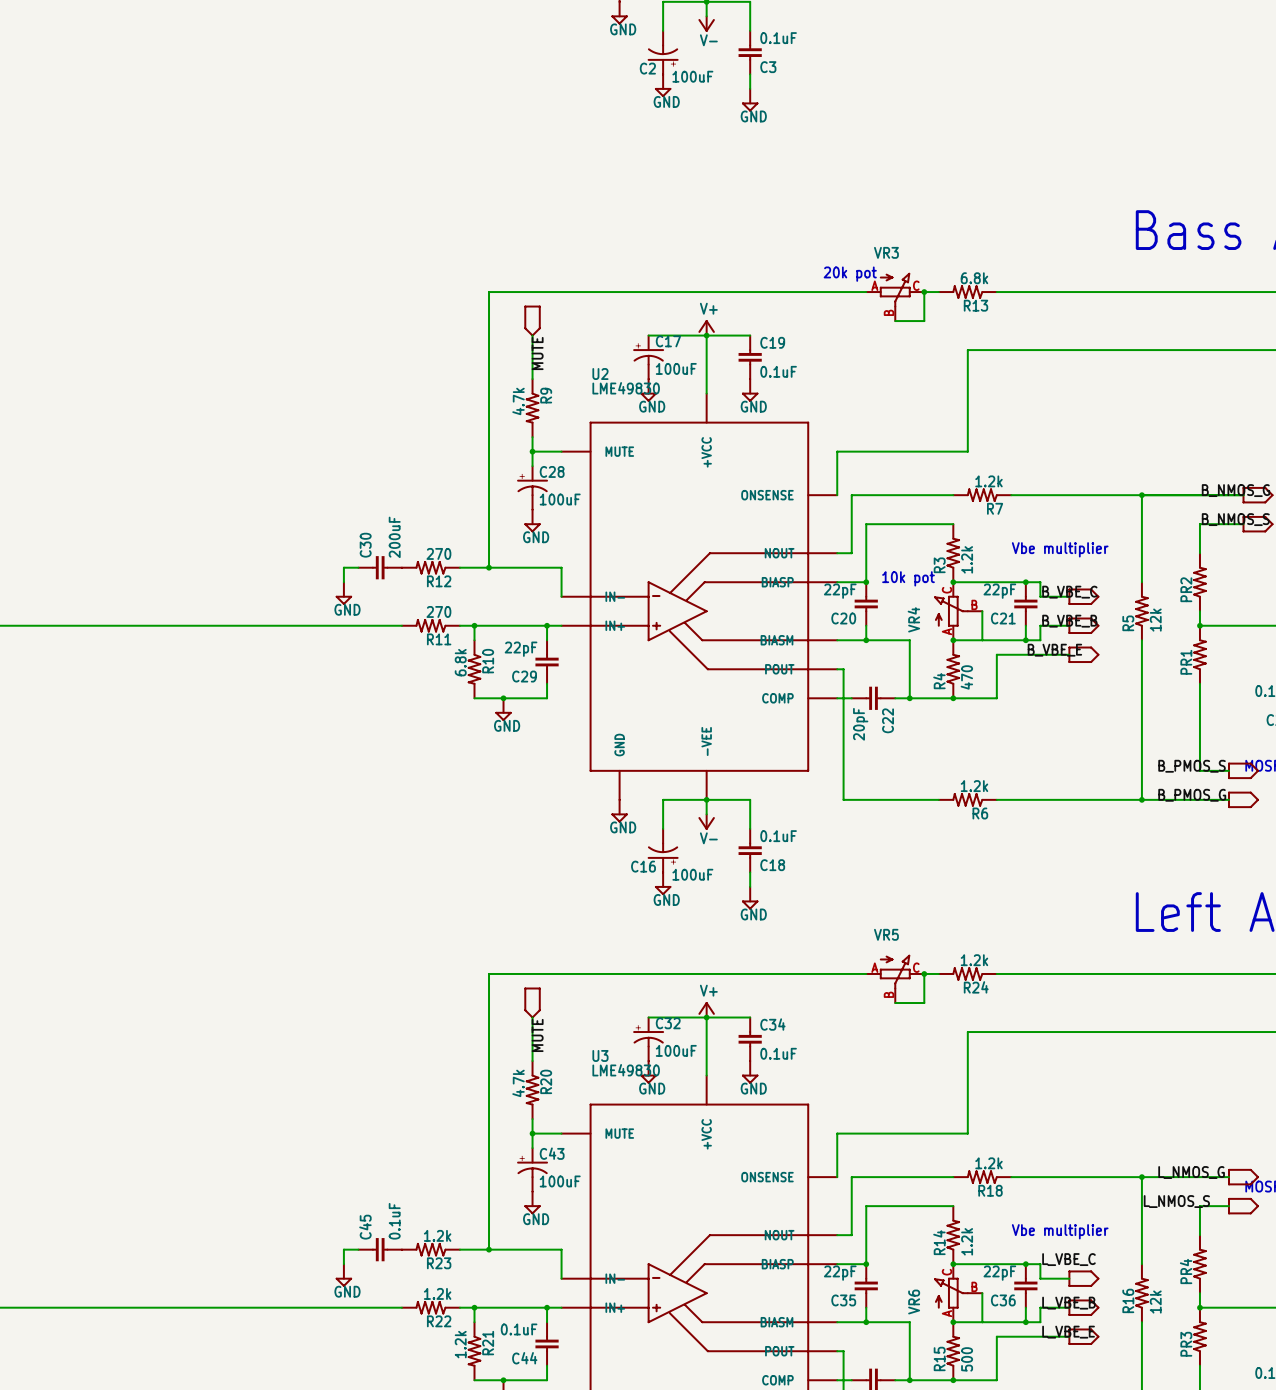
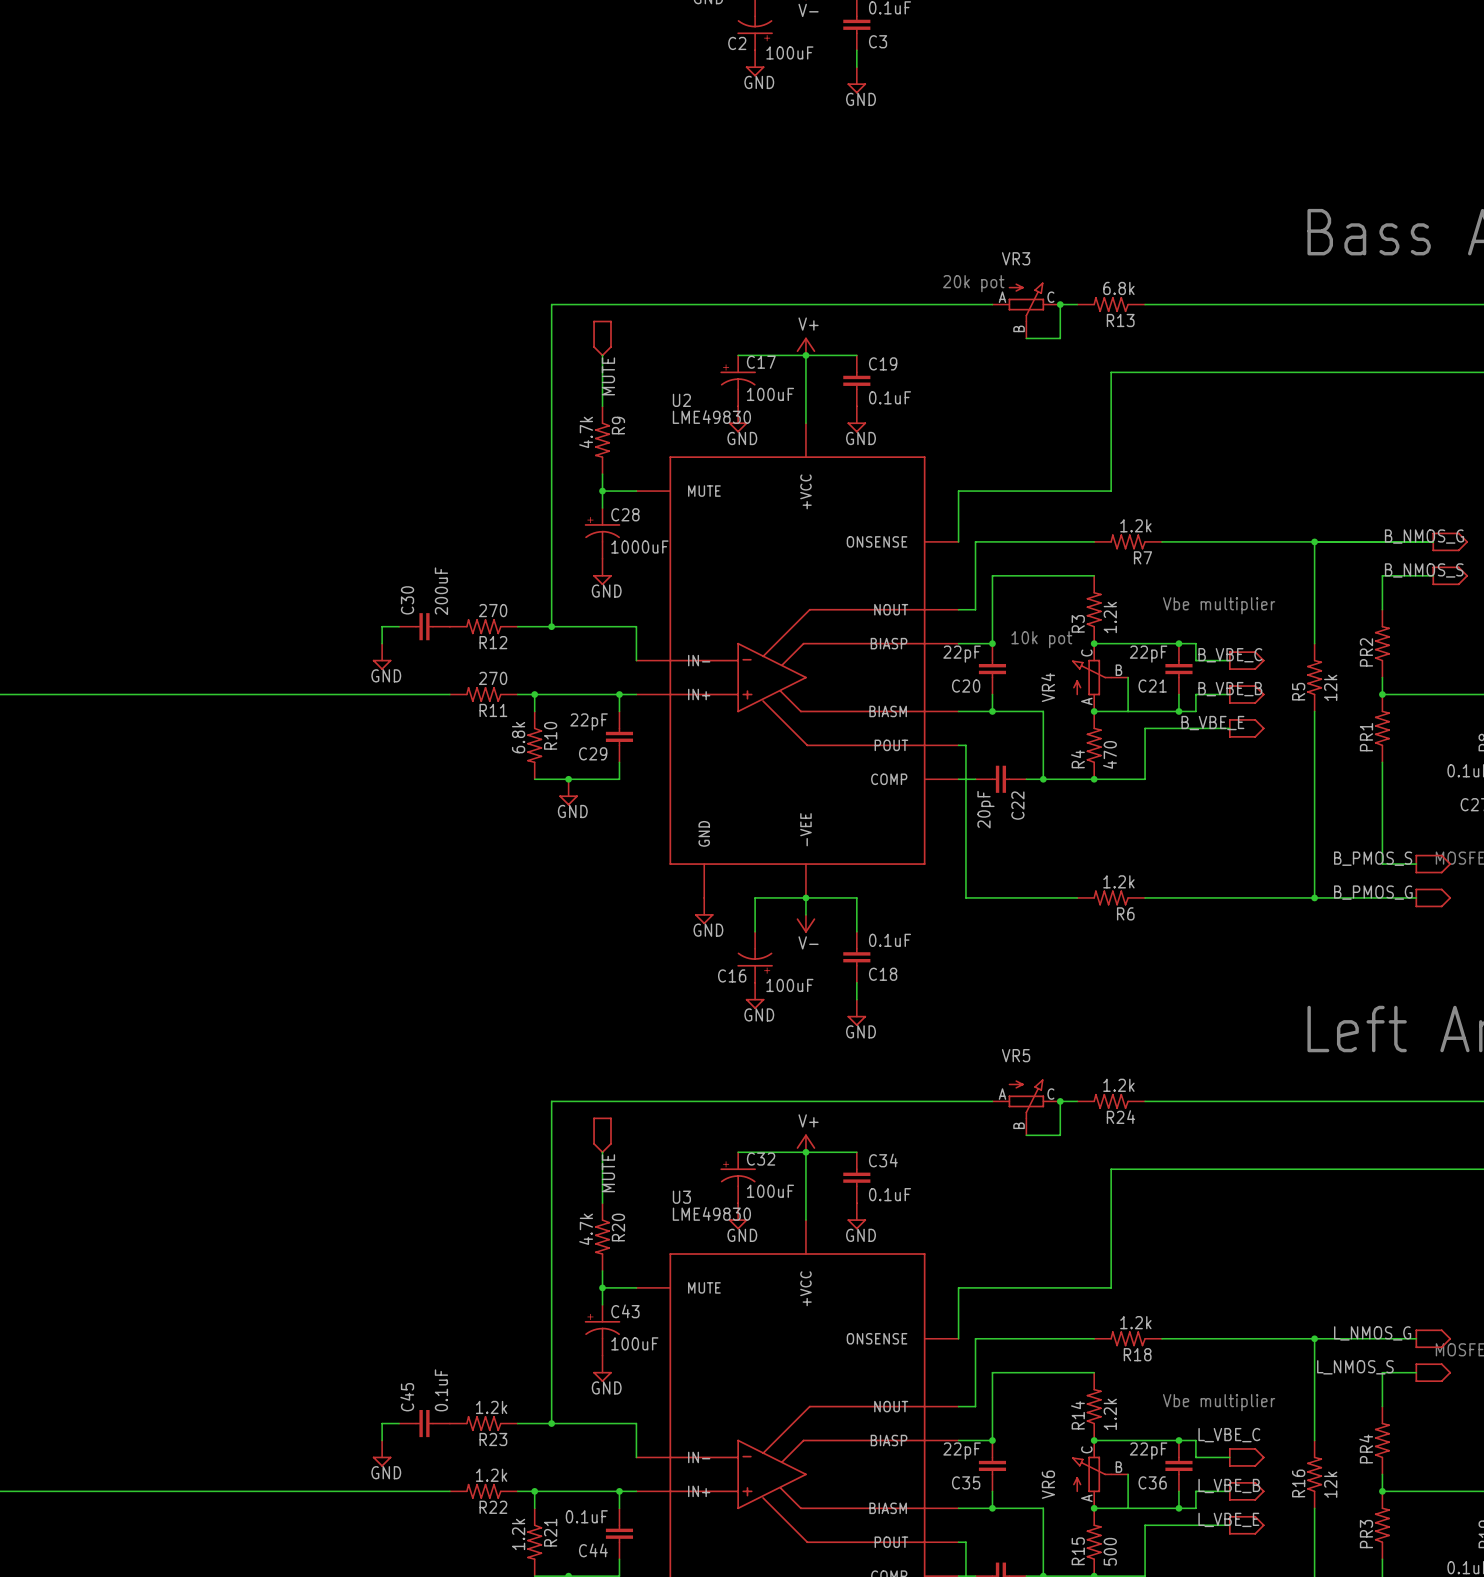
C28 value: 100uF (560, 499) -> 1000uF (639, 547)

